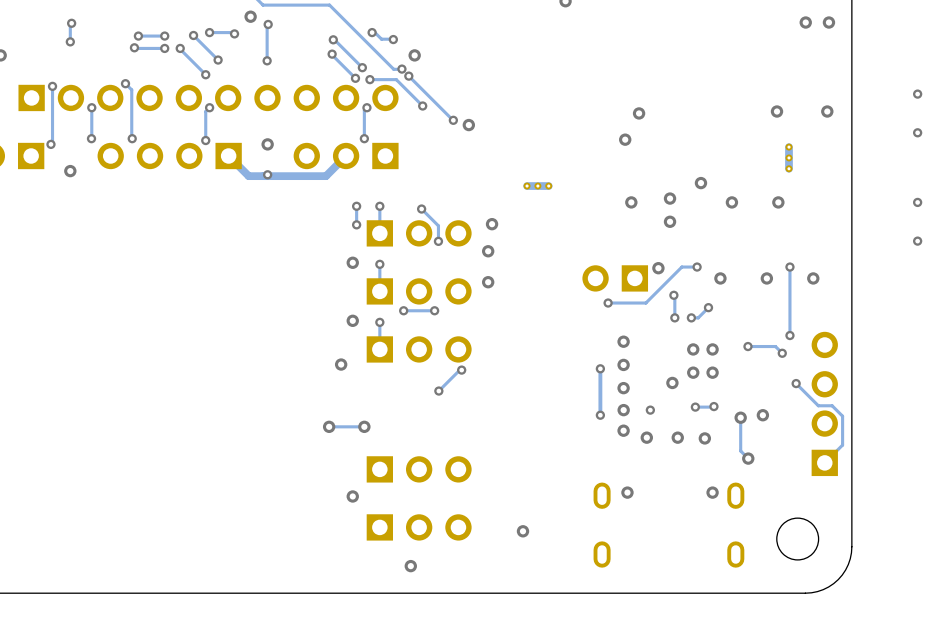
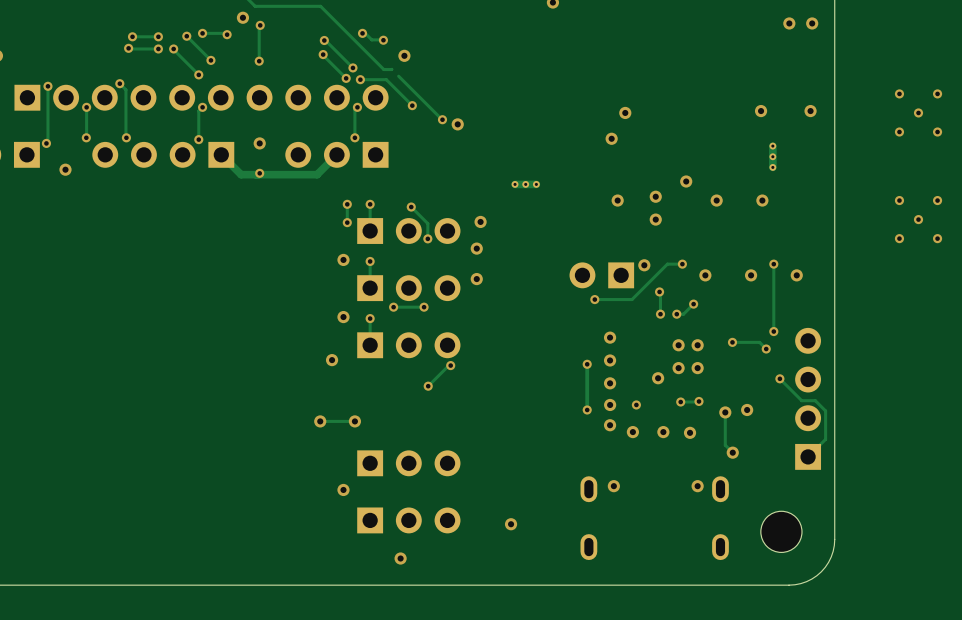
track: (71, 23) (70, 41) -> none
via: (71, 23) -> none
via: (70, 41) -> none
via: (401, 69) -> none
via: (408, 76) -> none

